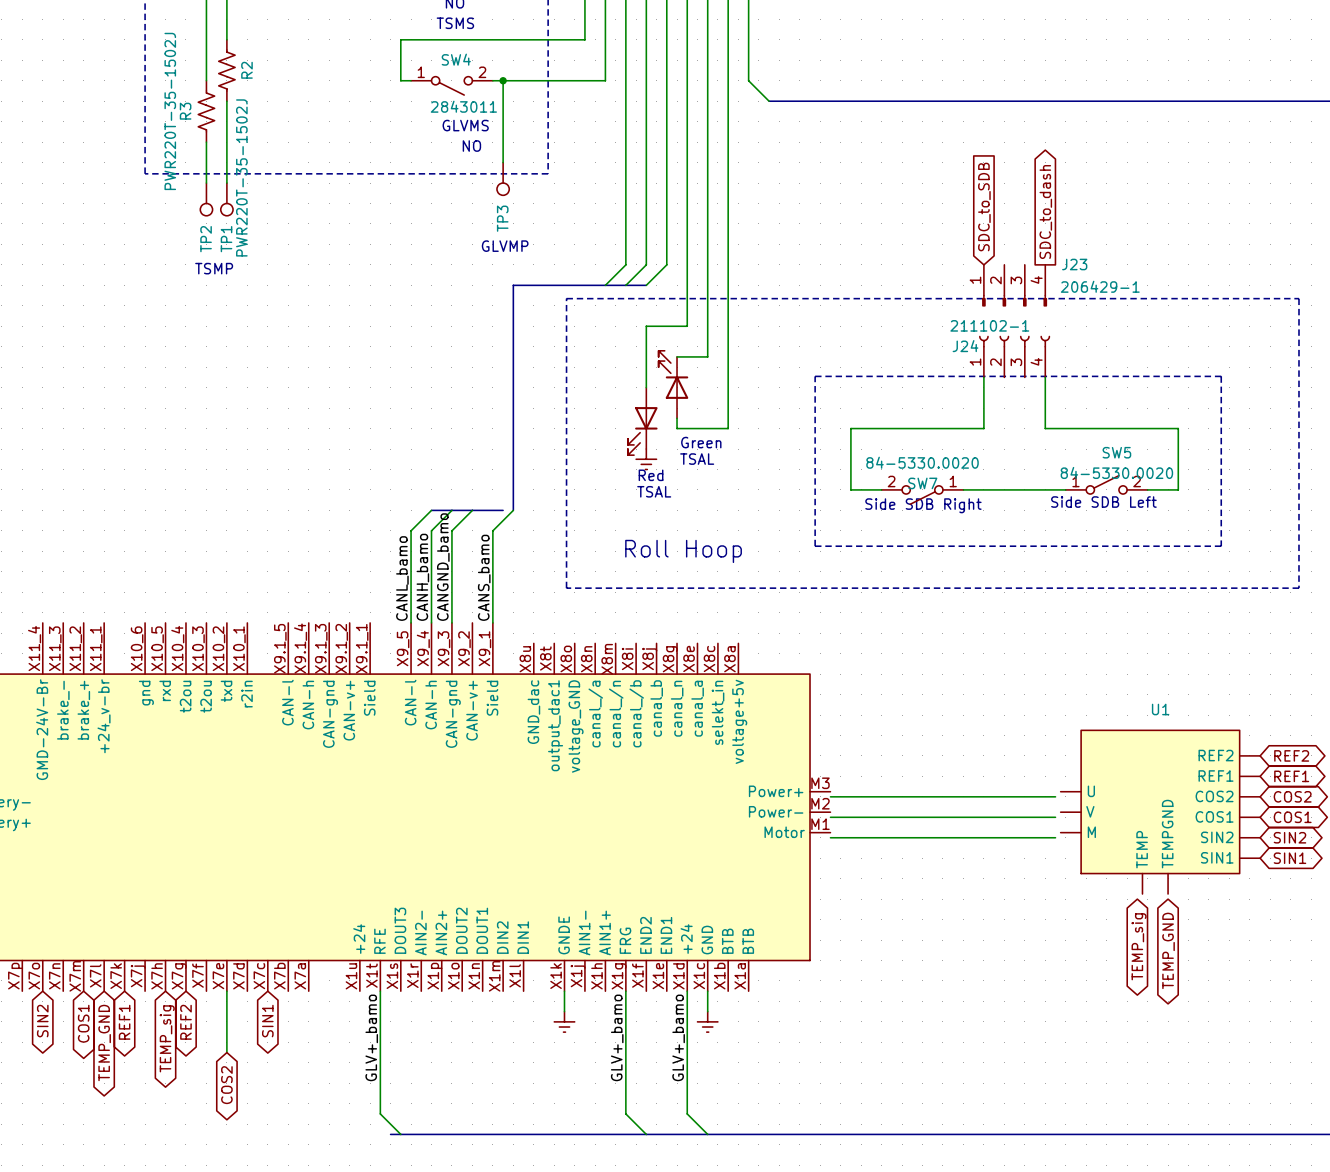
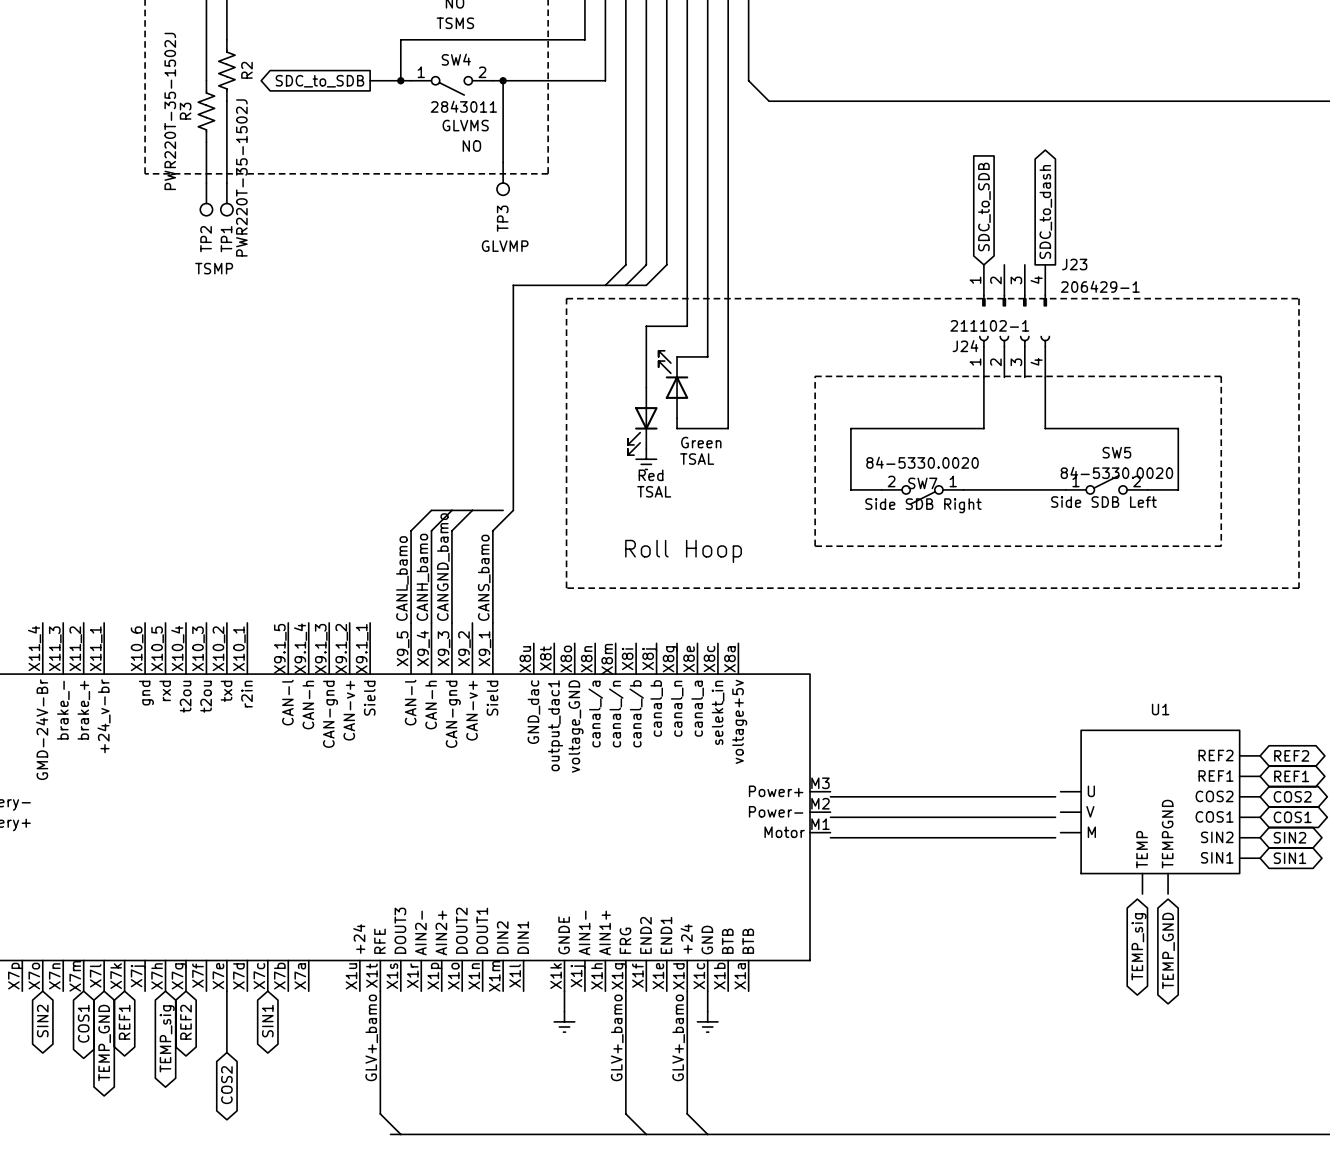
wire: none -> (370, 80) (400, 80)
junction: none -> (400, 80)
global label: none -> SDC_to_SDB (319, 81)

